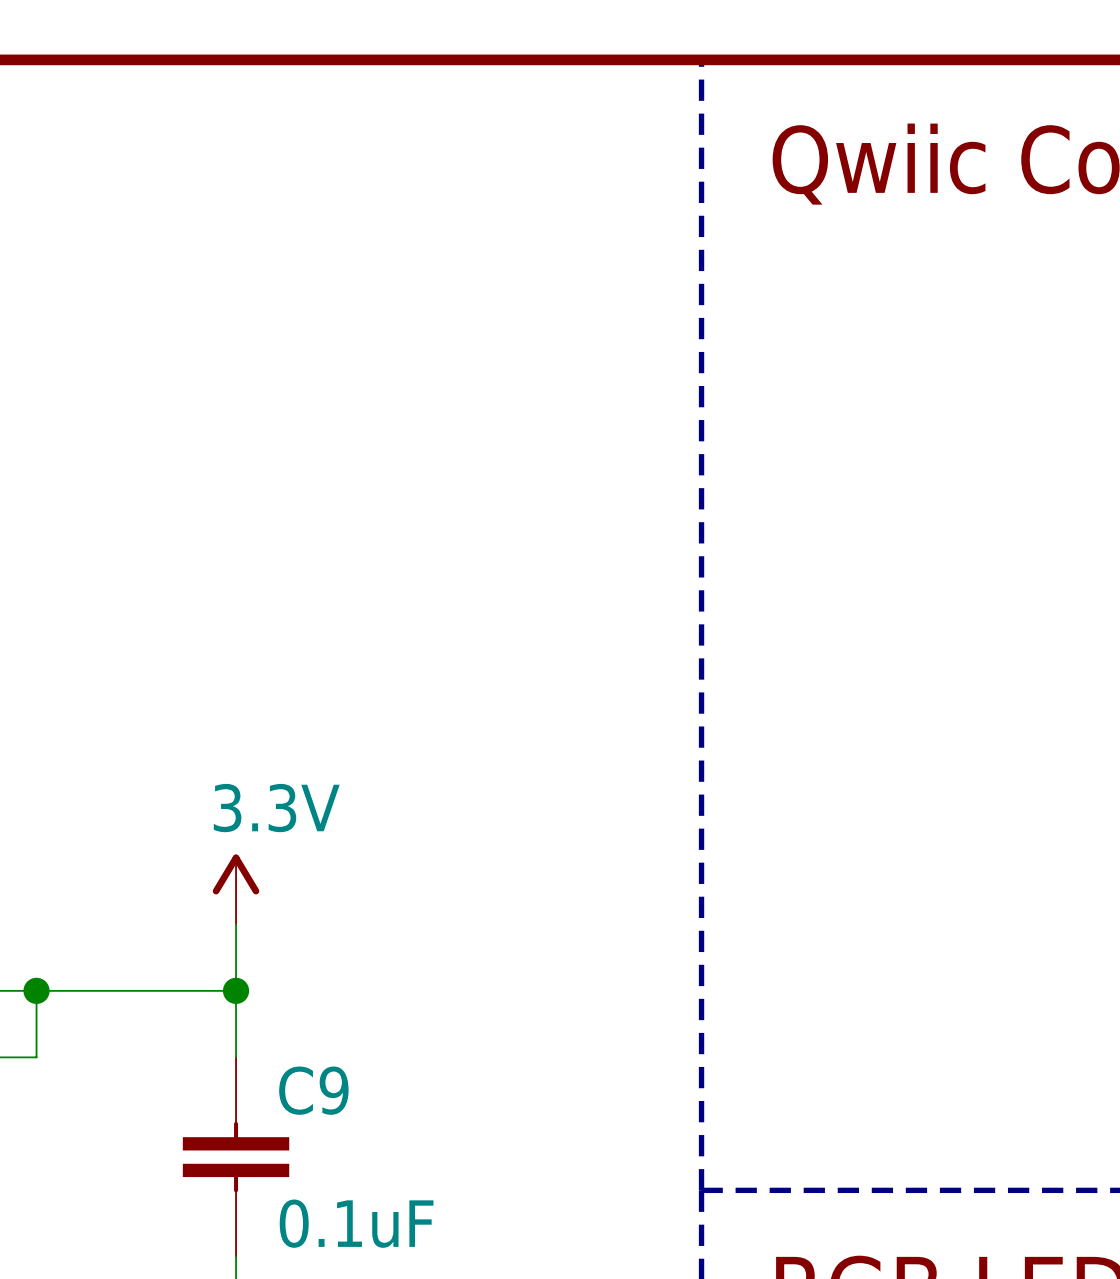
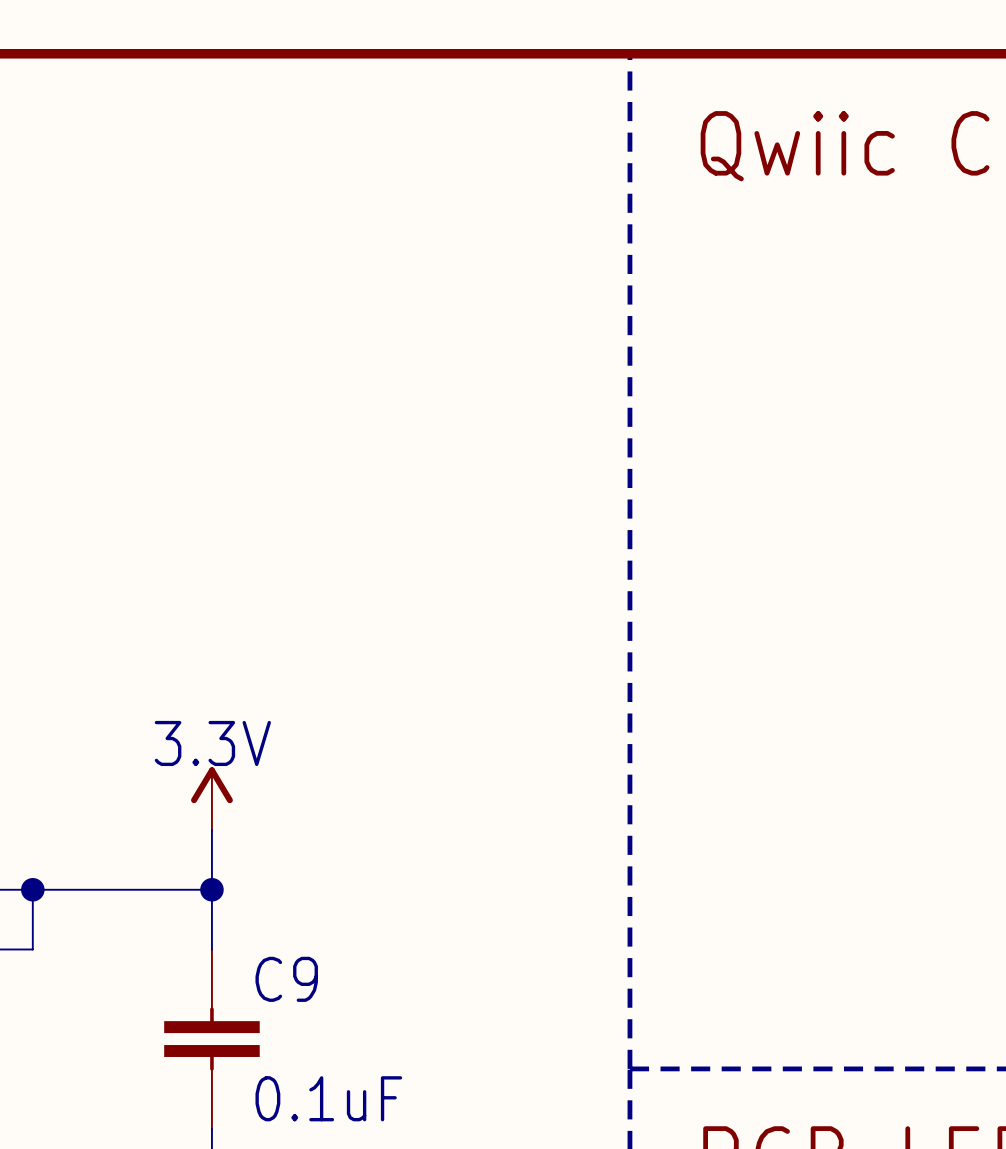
power symbol text position: 3.3V (276, 808) -> 3.3V (212, 743)

